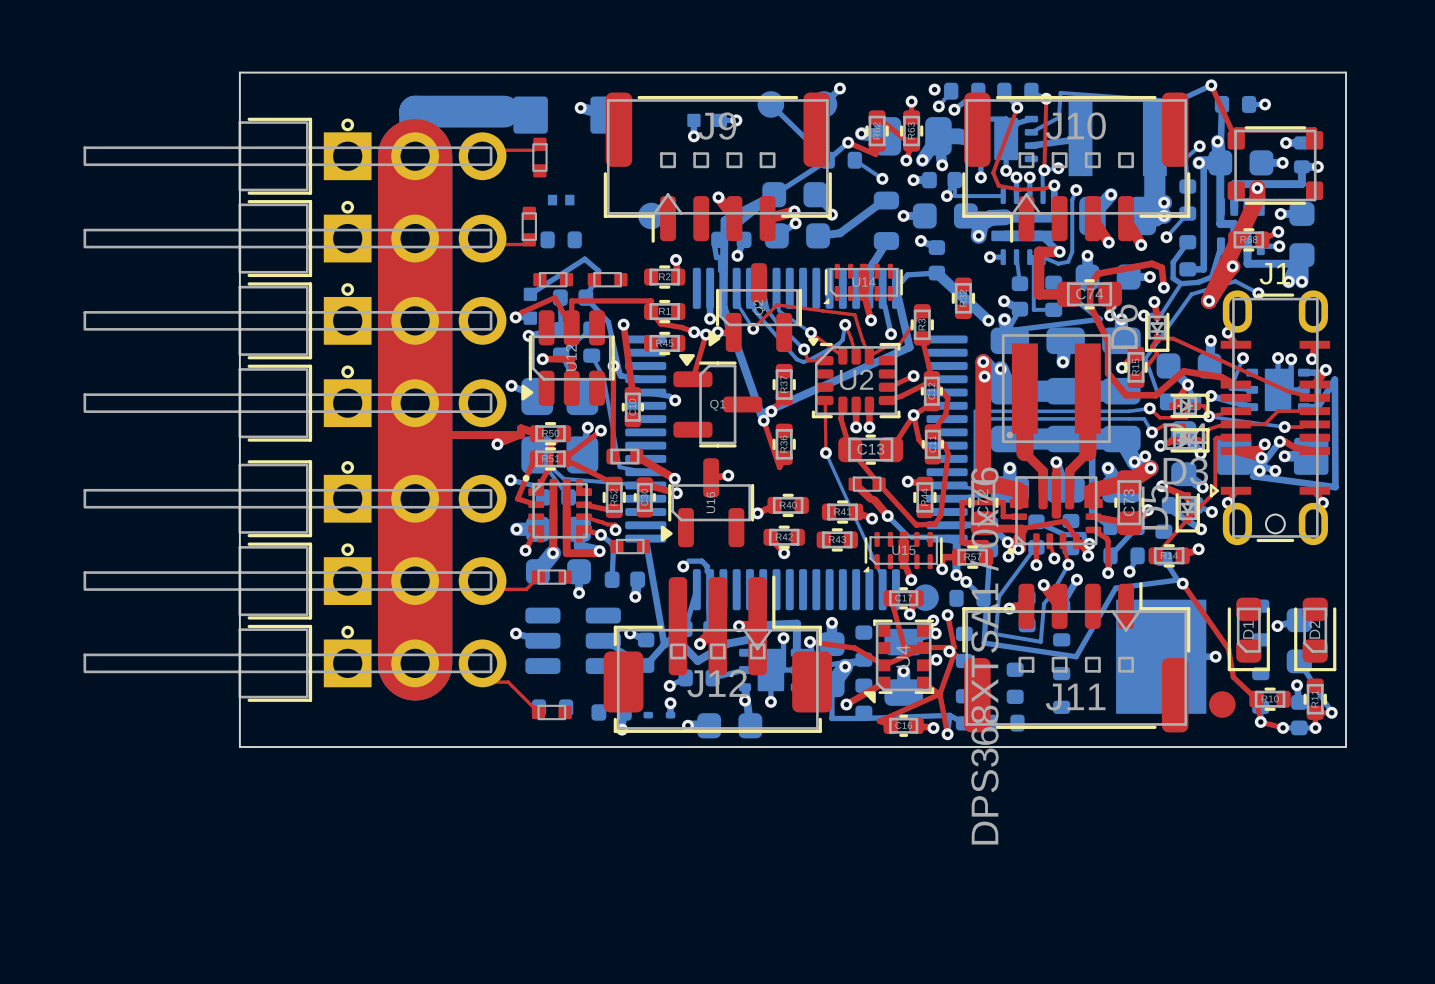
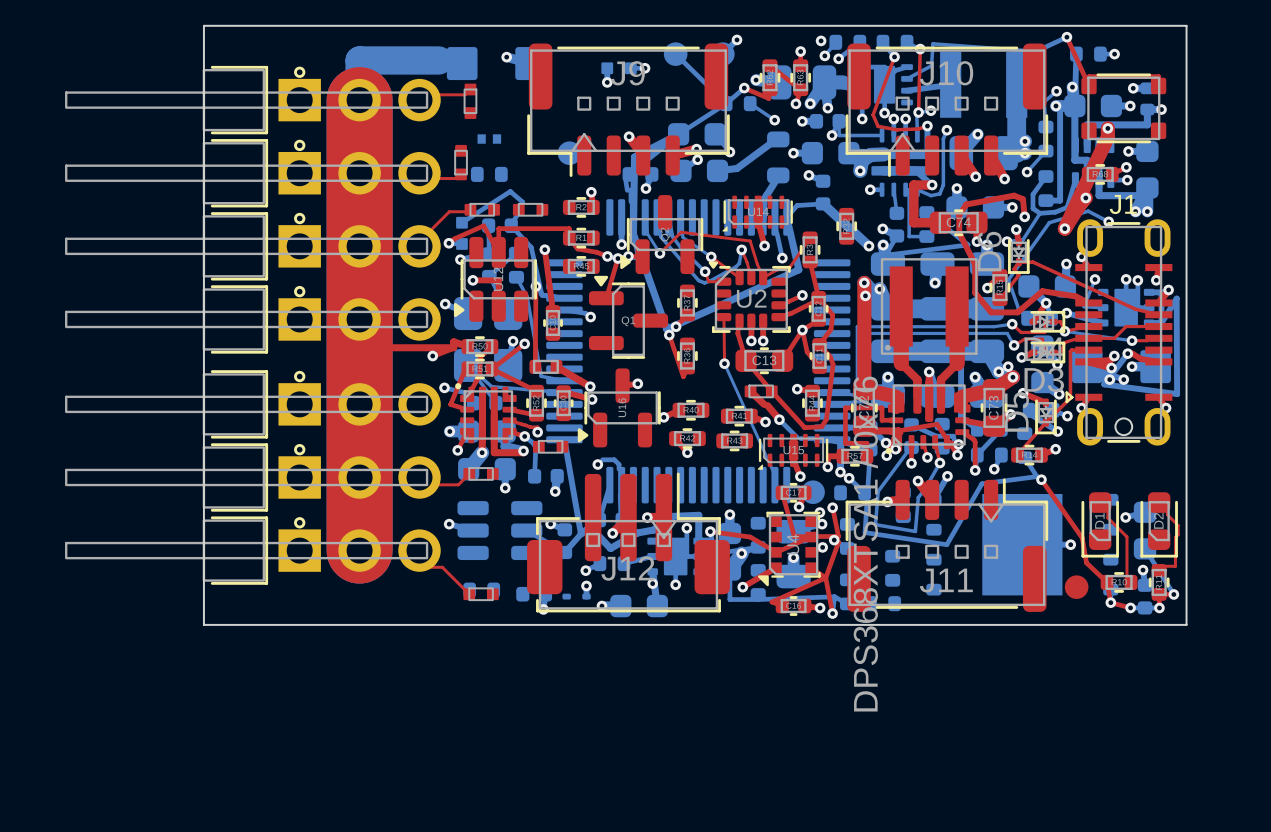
top track: none -> (468, 211) (449, 211) (417, 243)
top track: none -> (1107, 510) (1107, 517) (1126, 536) (1126, 577)
top track: none -> (1167, 510) (1167, 514) (1178, 525) (1178, 534) (1175, 537) (1175, 566) (1164, 566)

